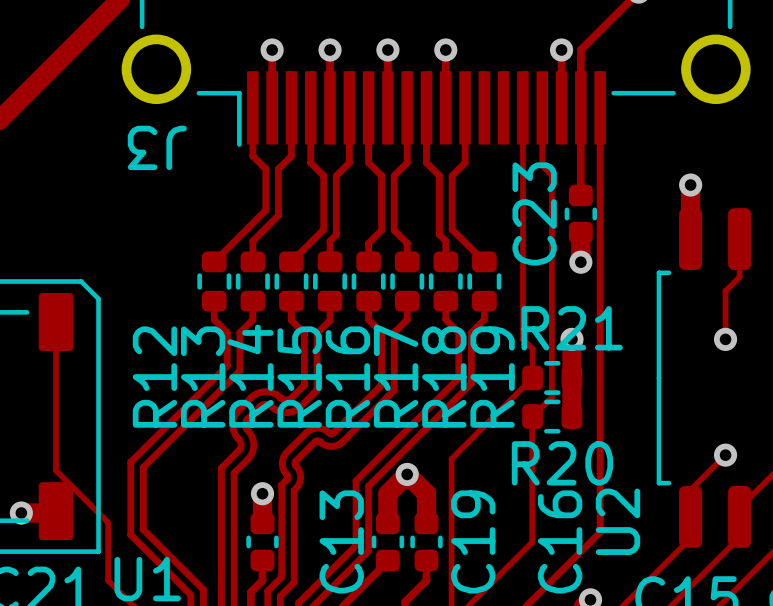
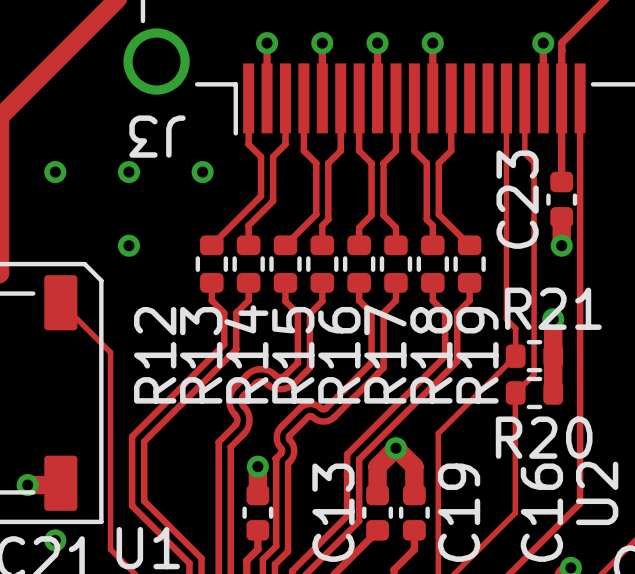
via: none -> (55, 172)
via: none -> (128, 172)
via: none -> (202, 172)
via: none -> (128, 245)
track: (56, 322) (56, 470) (108, 522) -> (60, 302) (110, 352) (110, 494)
via: none -> (55, 540)

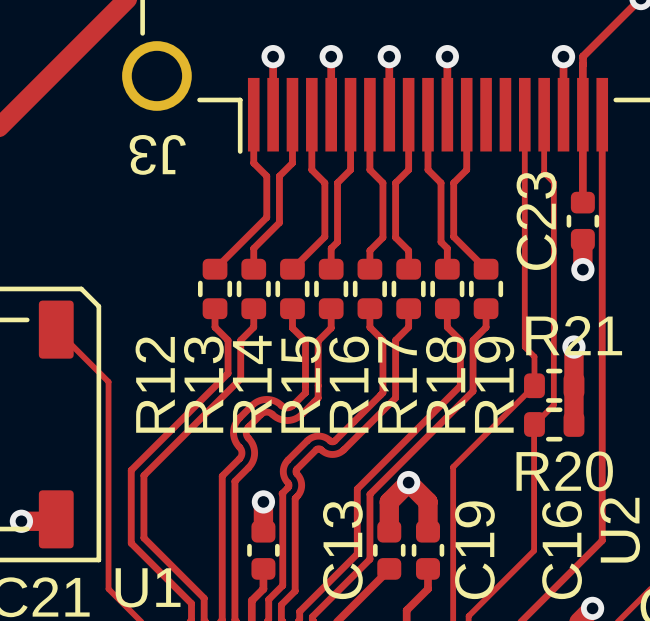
via: (55, 172) -> none
via: (128, 172) -> none
via: (202, 172) -> none
via: (128, 245) -> none
via: (55, 540) -> none

